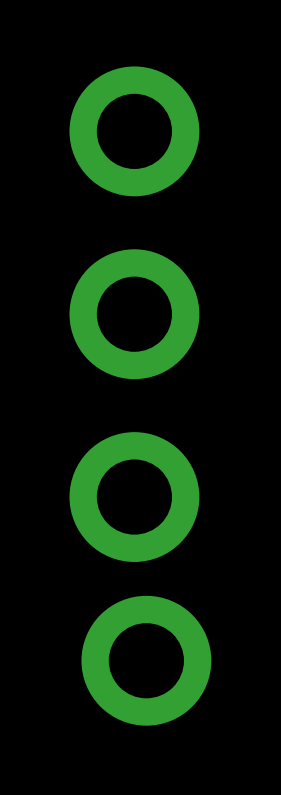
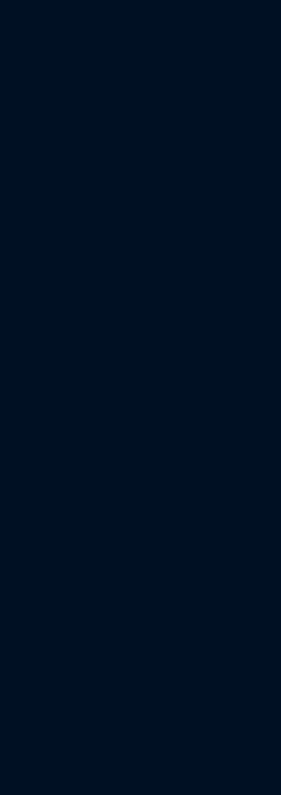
part: (134, 131) -> none
part: (134, 314) -> none
part: (134, 497) -> none
part: (146, 660) -> none

